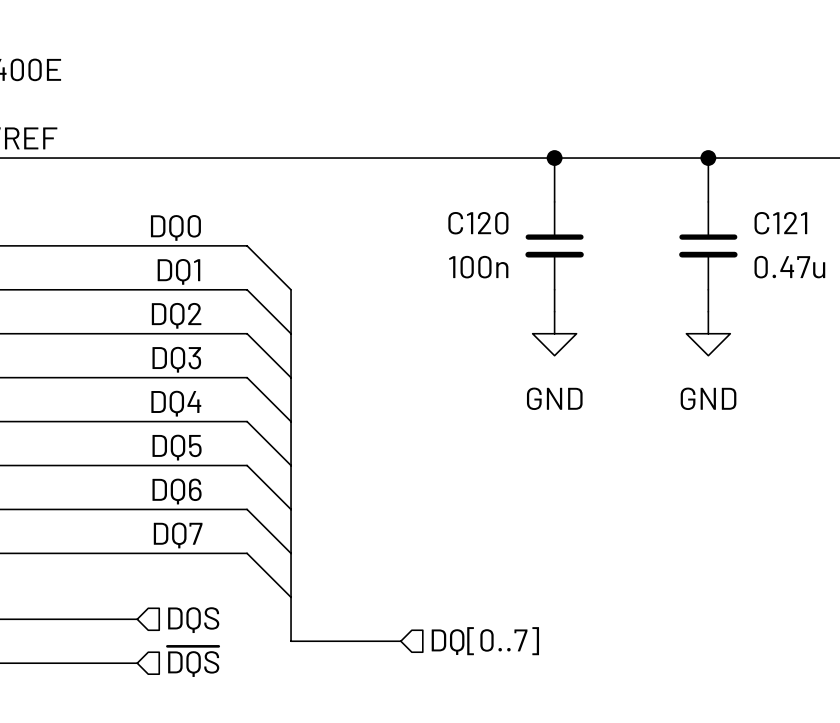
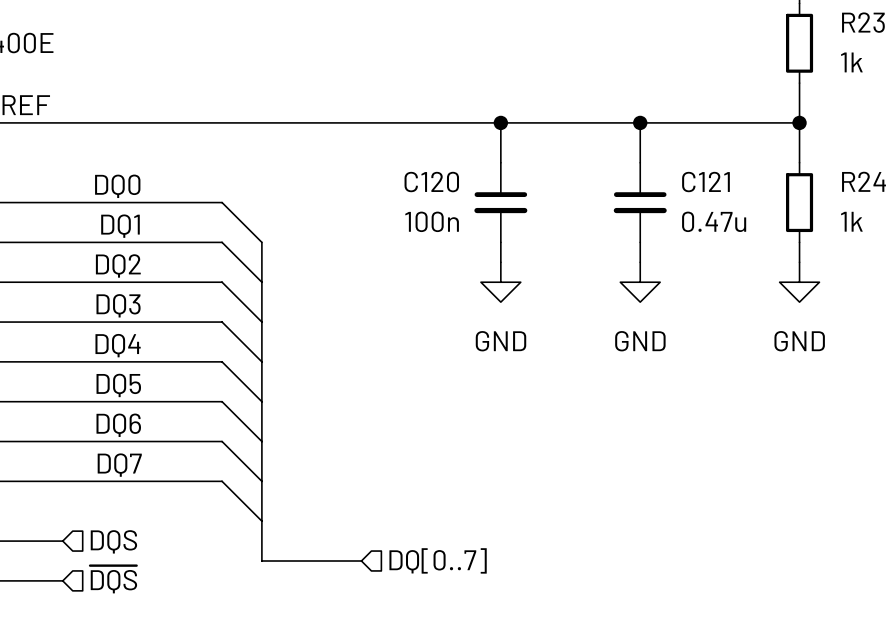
label position: DQ0 (175, 227) -> DQ0 (117, 186)
label position: DQ1 (178, 271) -> DQ1 (120, 226)
label position: DQ2 (176, 315) -> DQ2 (118, 265)
label position: DQ3 (176, 359) -> DQ3 (118, 305)
label position: DQ4 (176, 403) -> DQ4 (118, 345)
label position: DQ5 (177, 447) -> DQ5 (118, 385)
label position: DQ6 (177, 491) -> DQ6 (118, 425)
label position: DQ7 (178, 535) -> DQ7 (119, 465)
wire: (71, 619) (137, 619) -> none
hierarchical label position: DQS (193, 620) -> DQS (113, 541)
hierarchical label position: ~{DQS} (193, 661) -> ~{DQS} (113, 579)
wire: (71, 663) (137, 663) -> none

